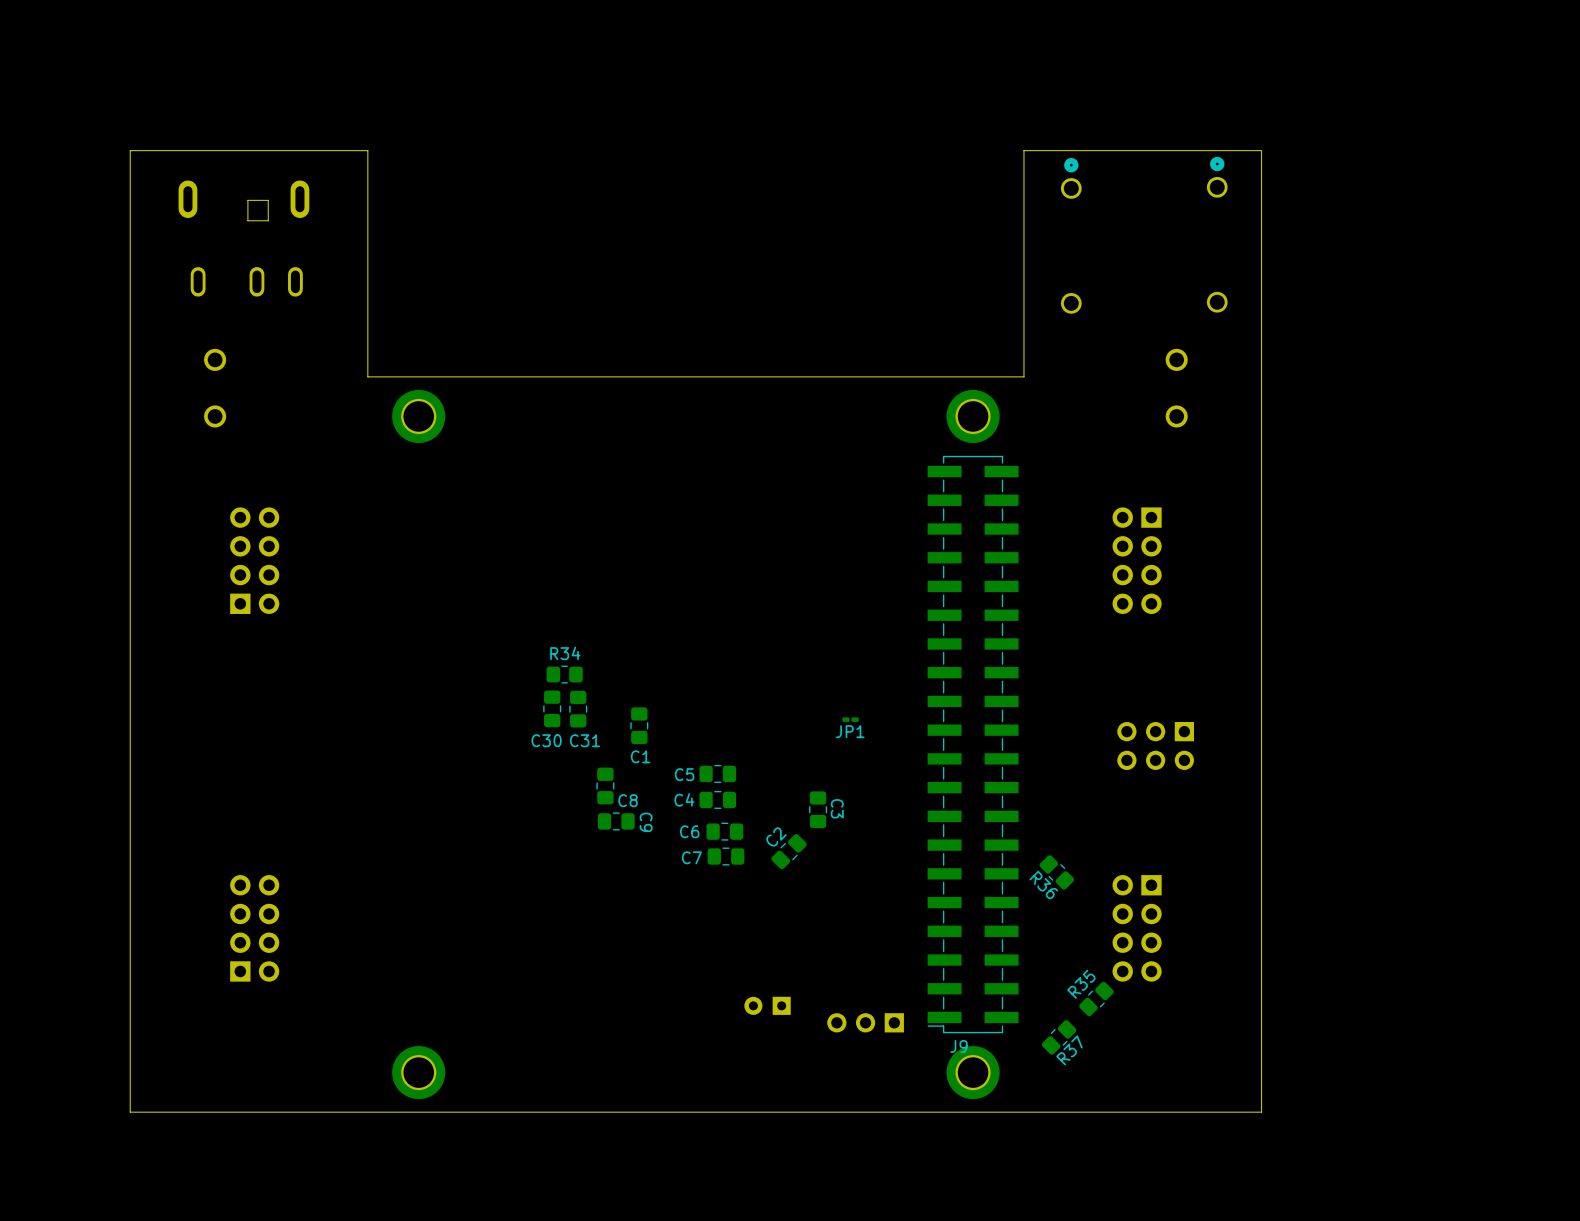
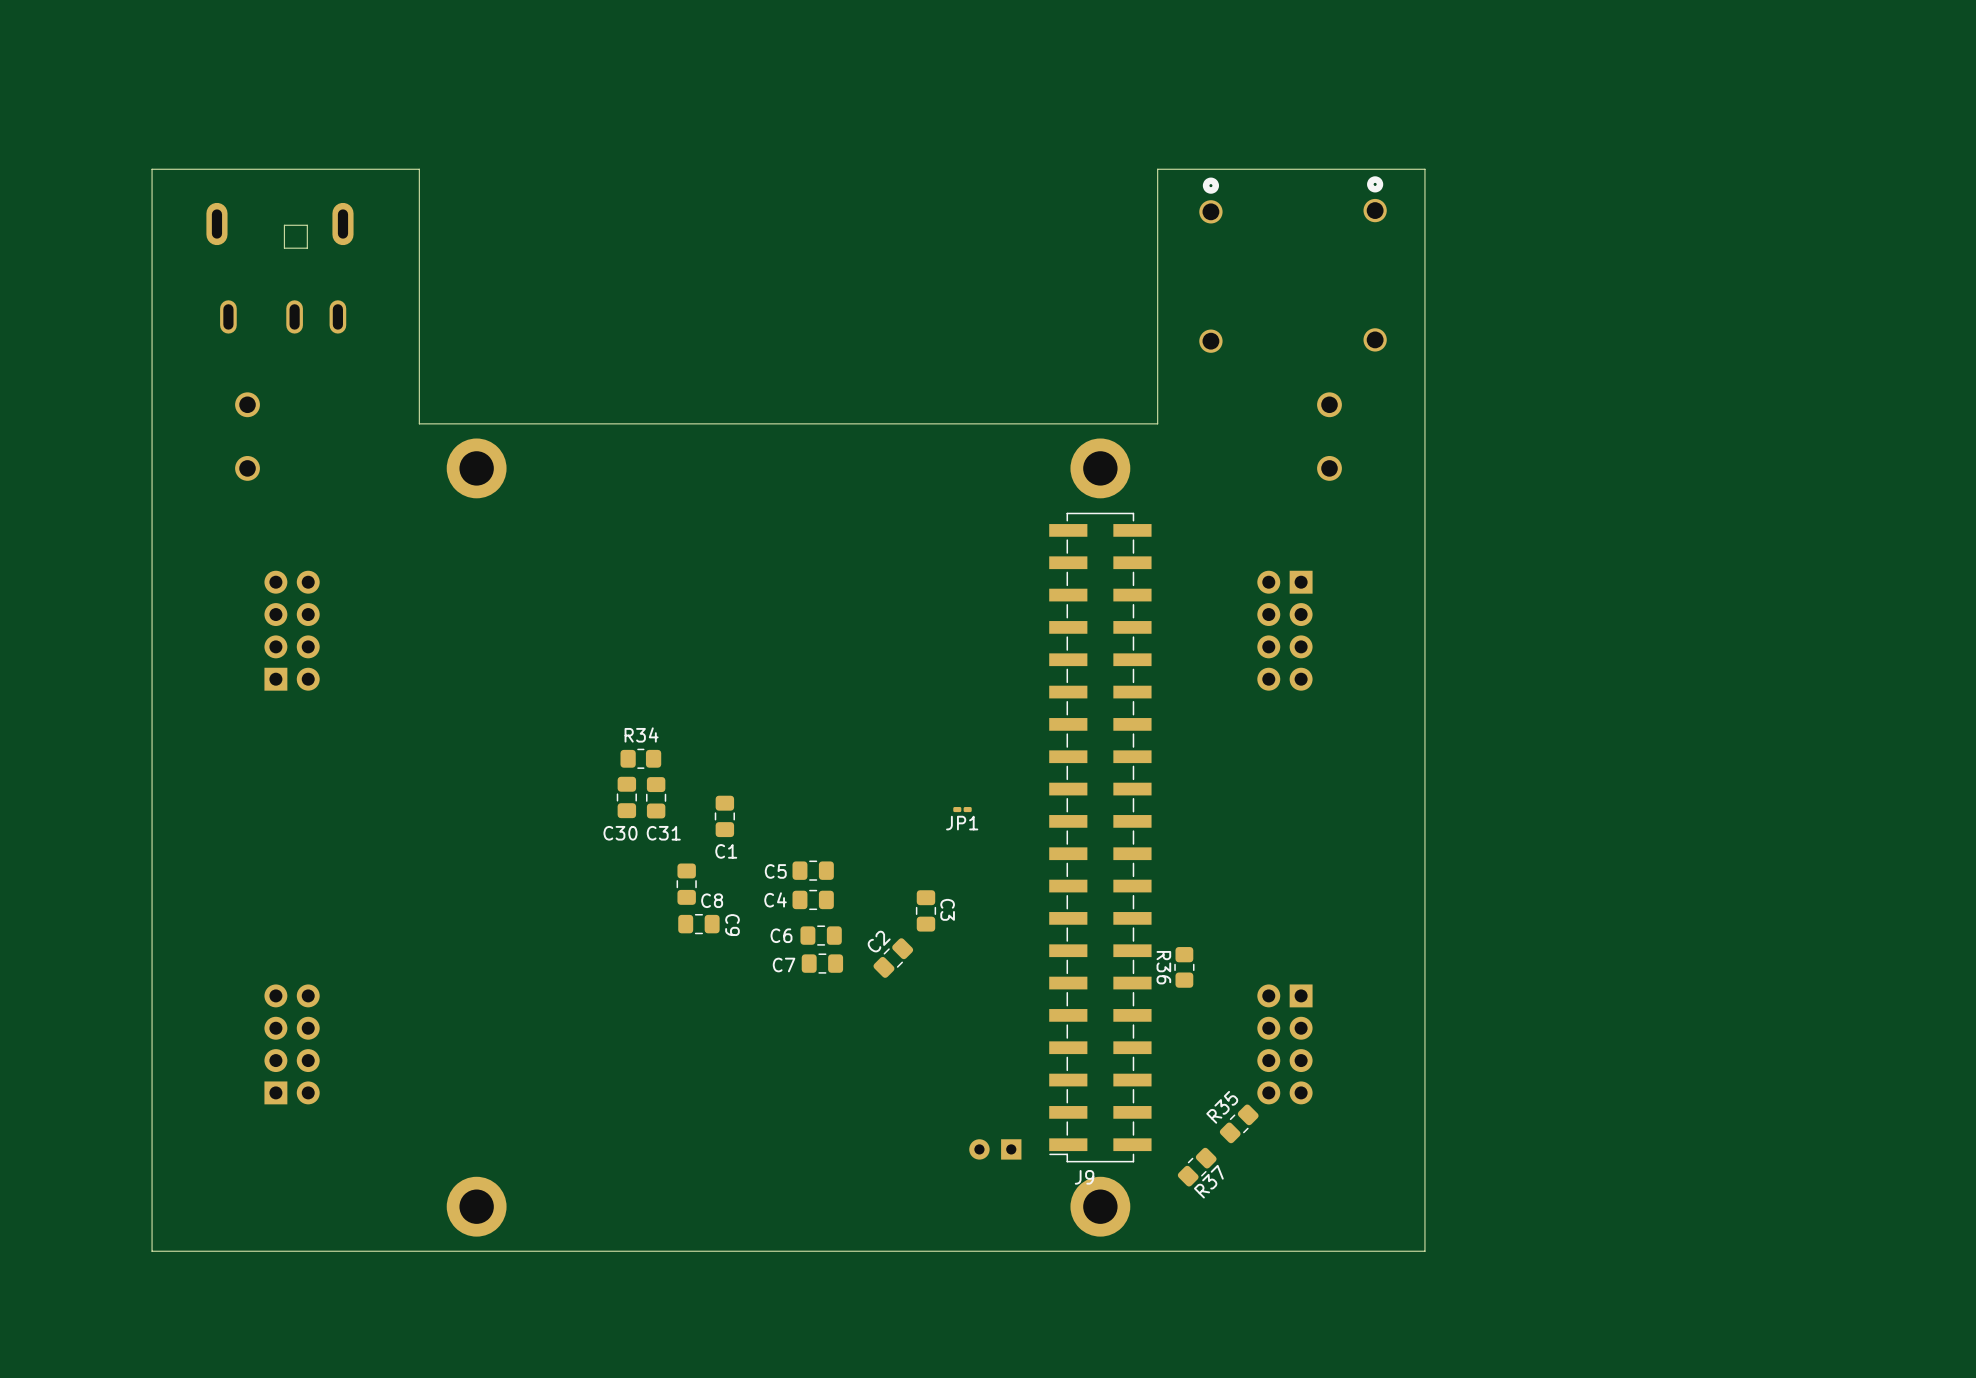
part: (1155, 746) -> none
R36 rotation: 0° (1056, 872) -> 45° clockwise (1184, 967)
part position: (767, 1005) -> (995, 1149)
part: (865, 1022) -> none

